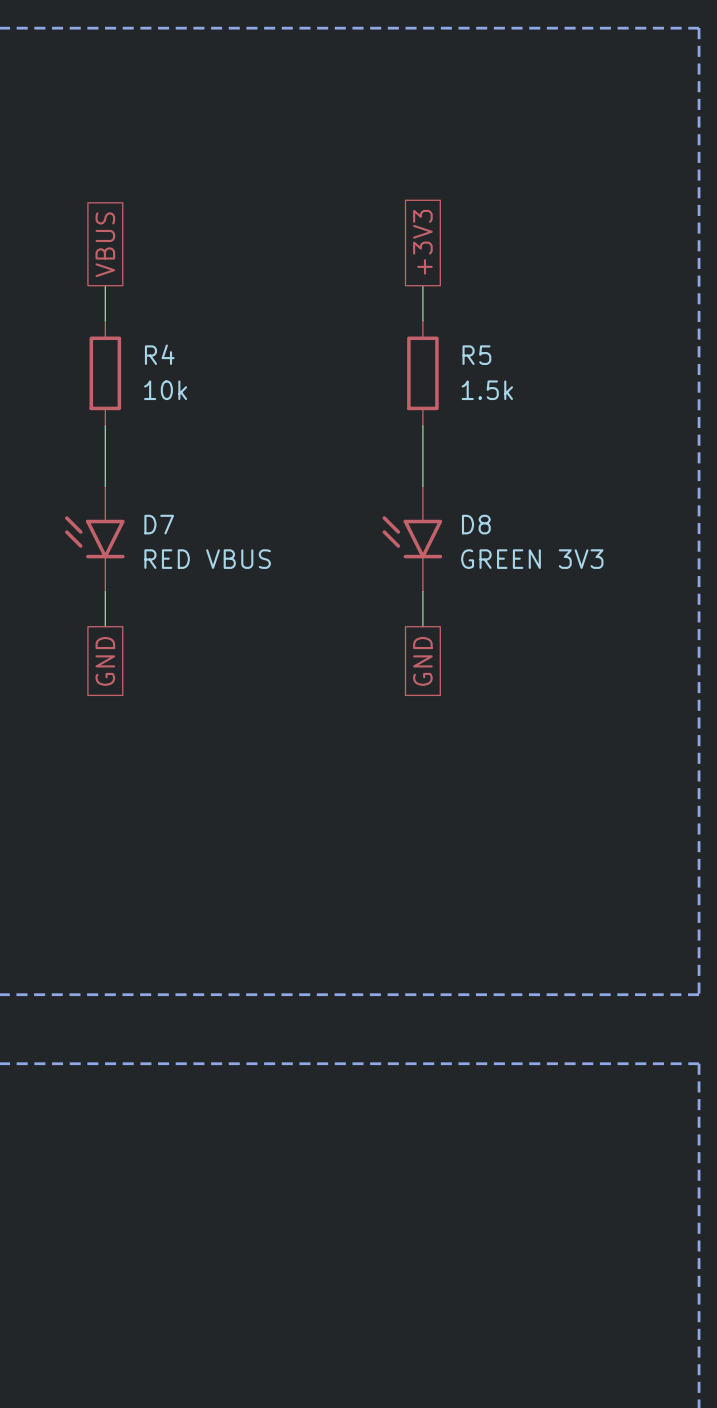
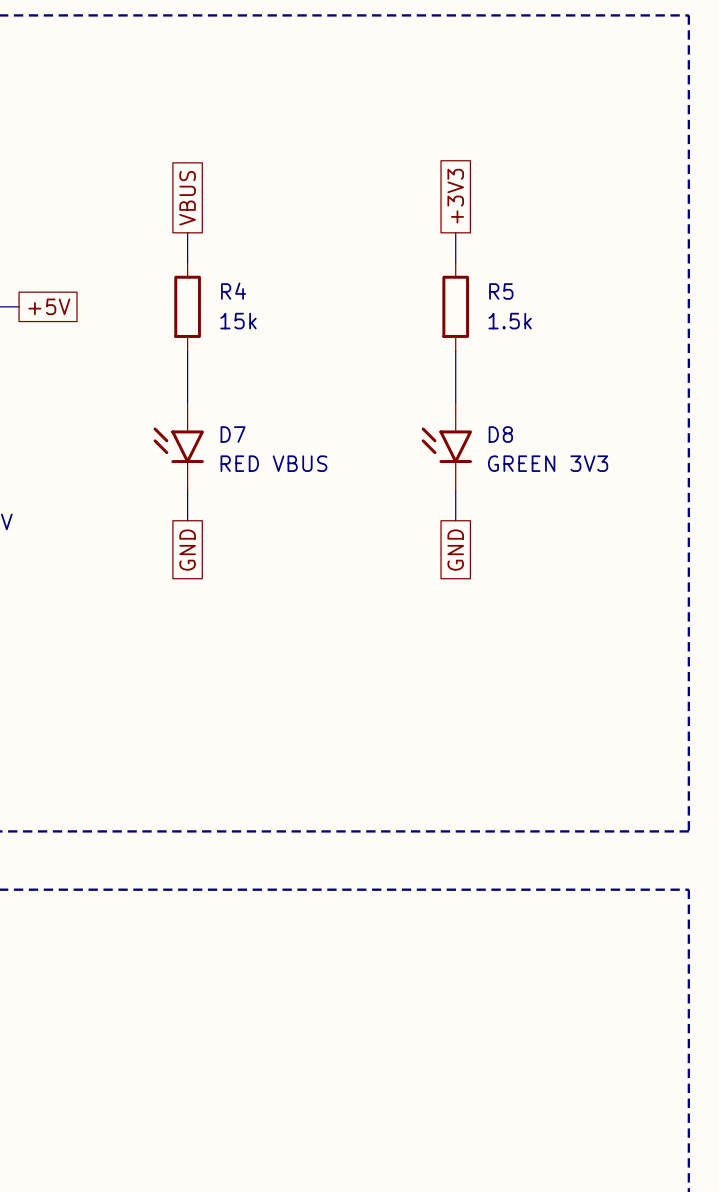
R4 value: 10k (165, 390) -> 15k (238, 321)

